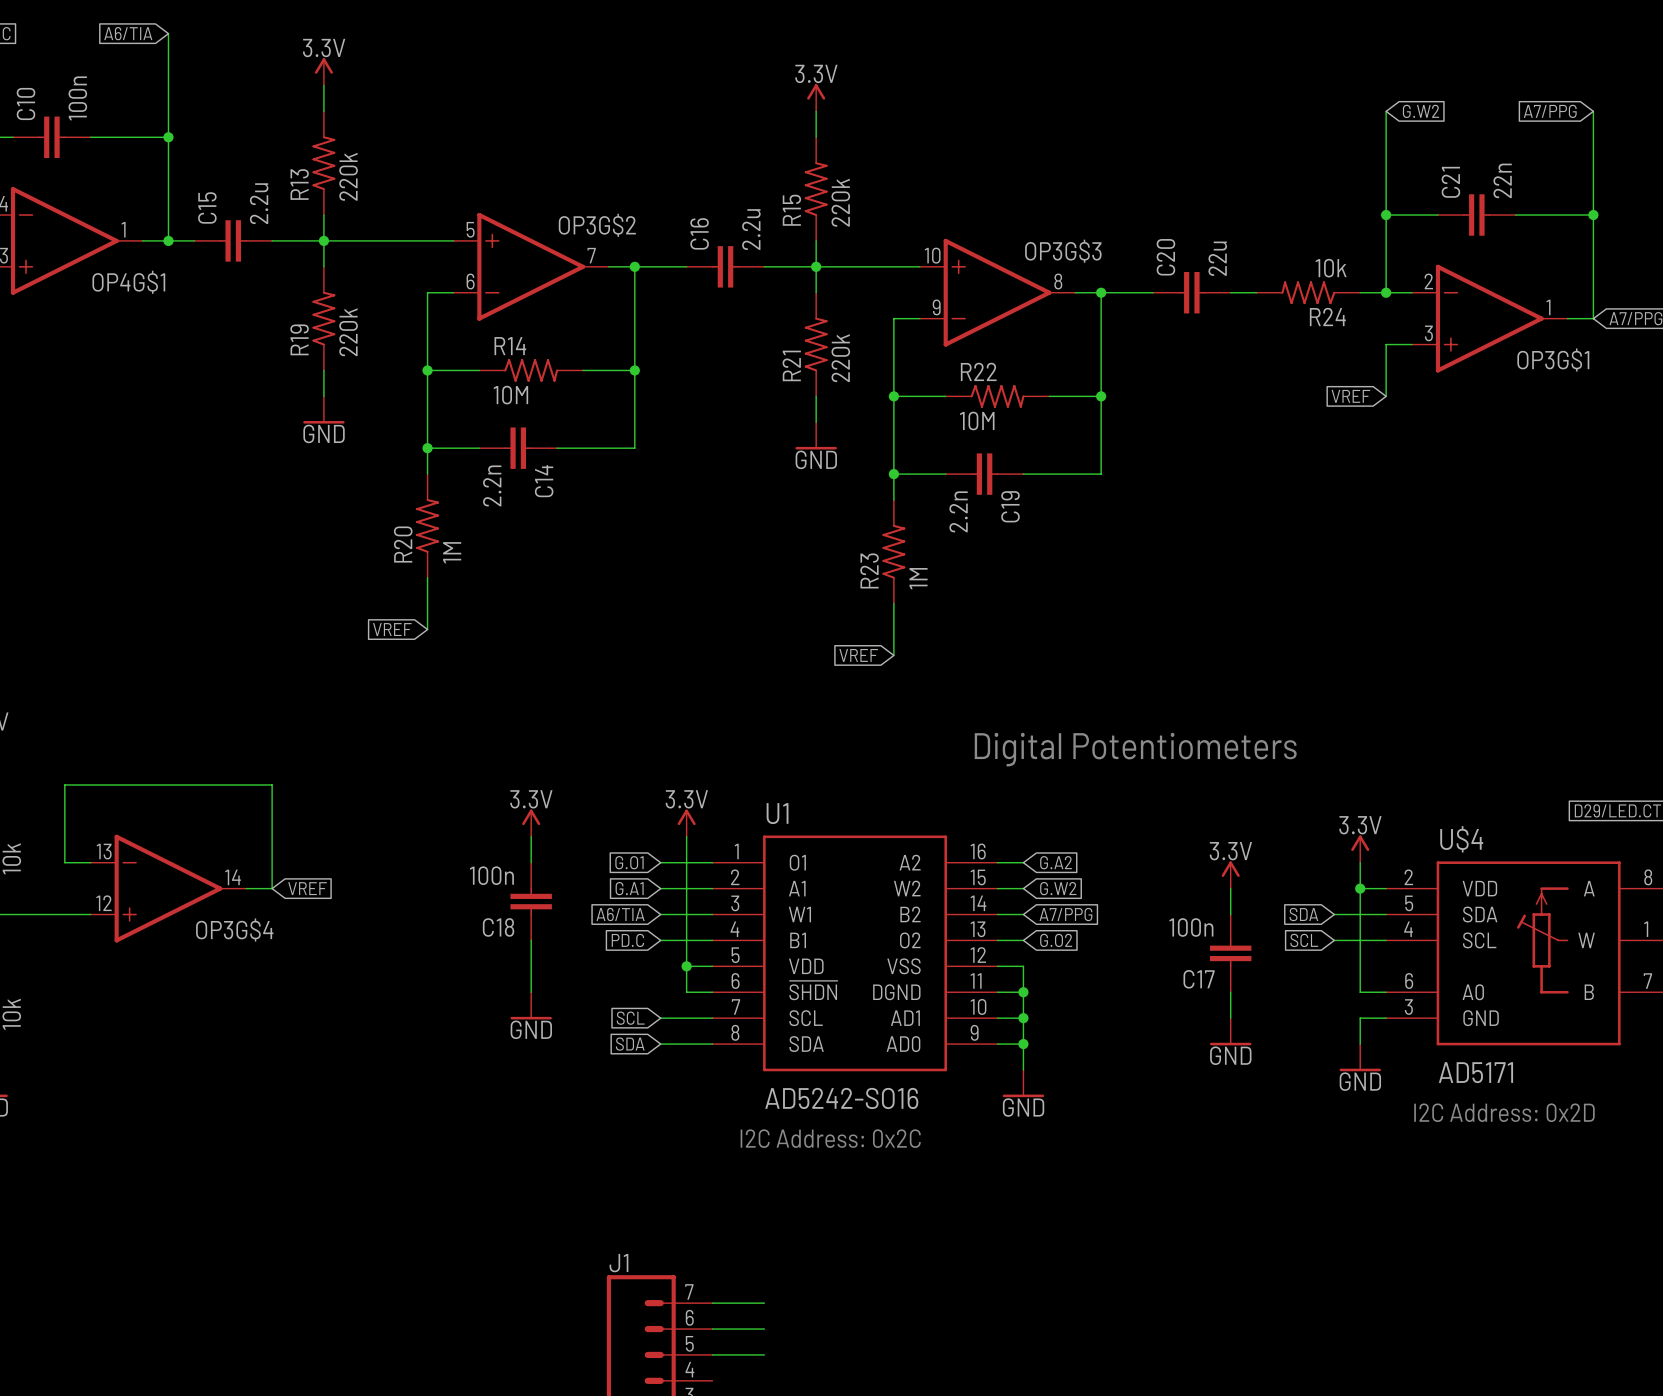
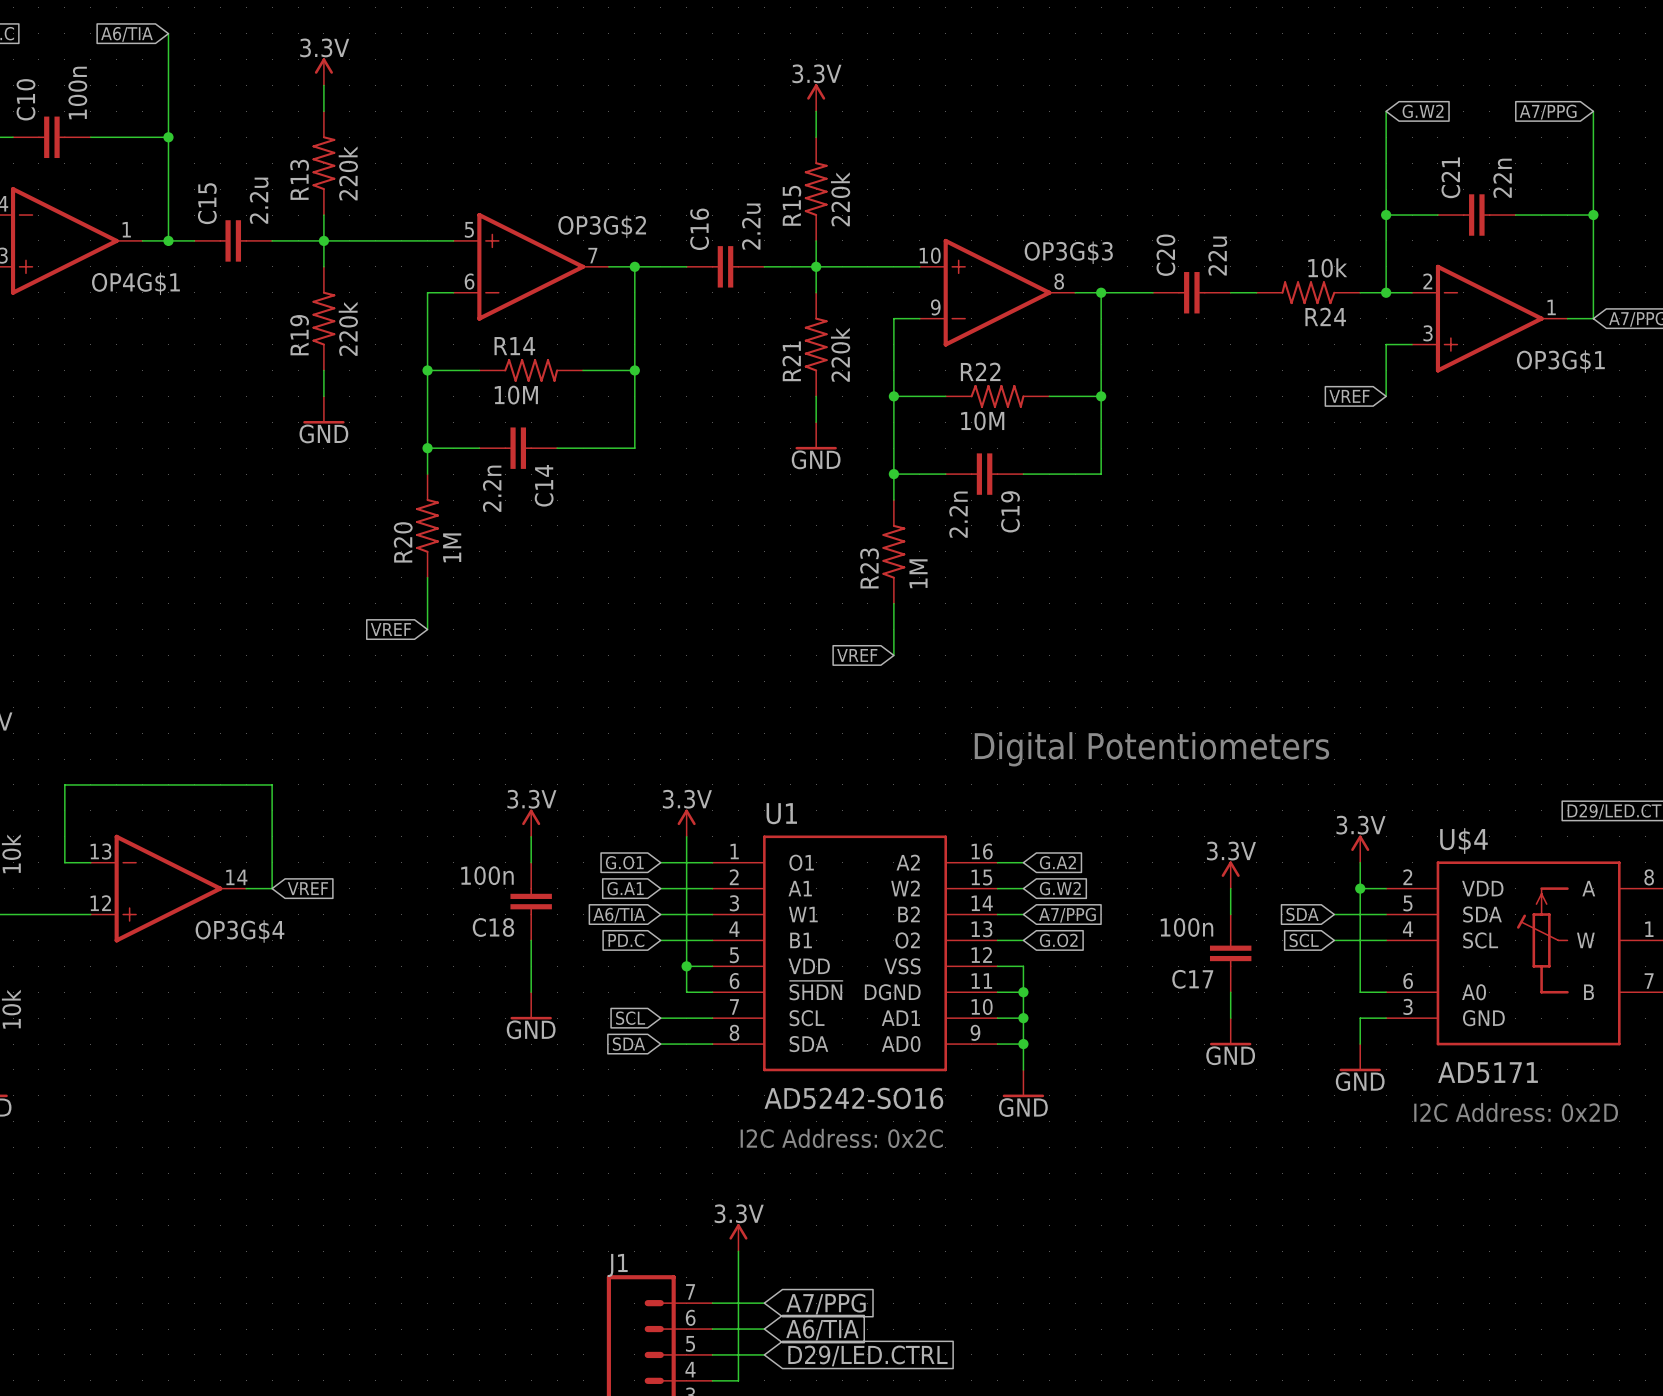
power symbol: none -> 3.3V (738, 1237)
wire: none -> (738, 1251) (738, 1380) (712, 1380)
global label: none -> A7/PPG (826, 1304)
global label: none -> A6/TIA (822, 1330)
global label: none -> D29/LED.CTRL (867, 1355)

